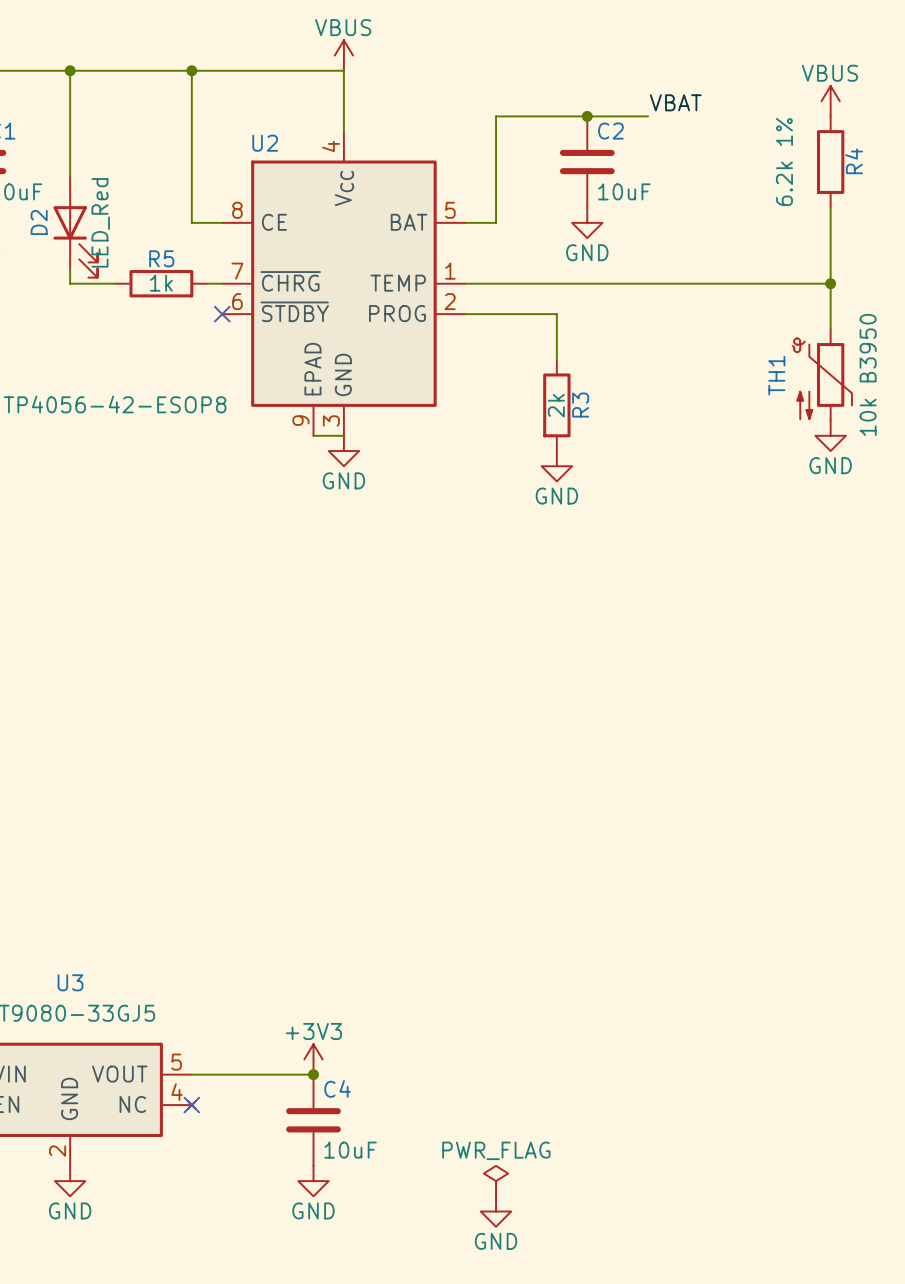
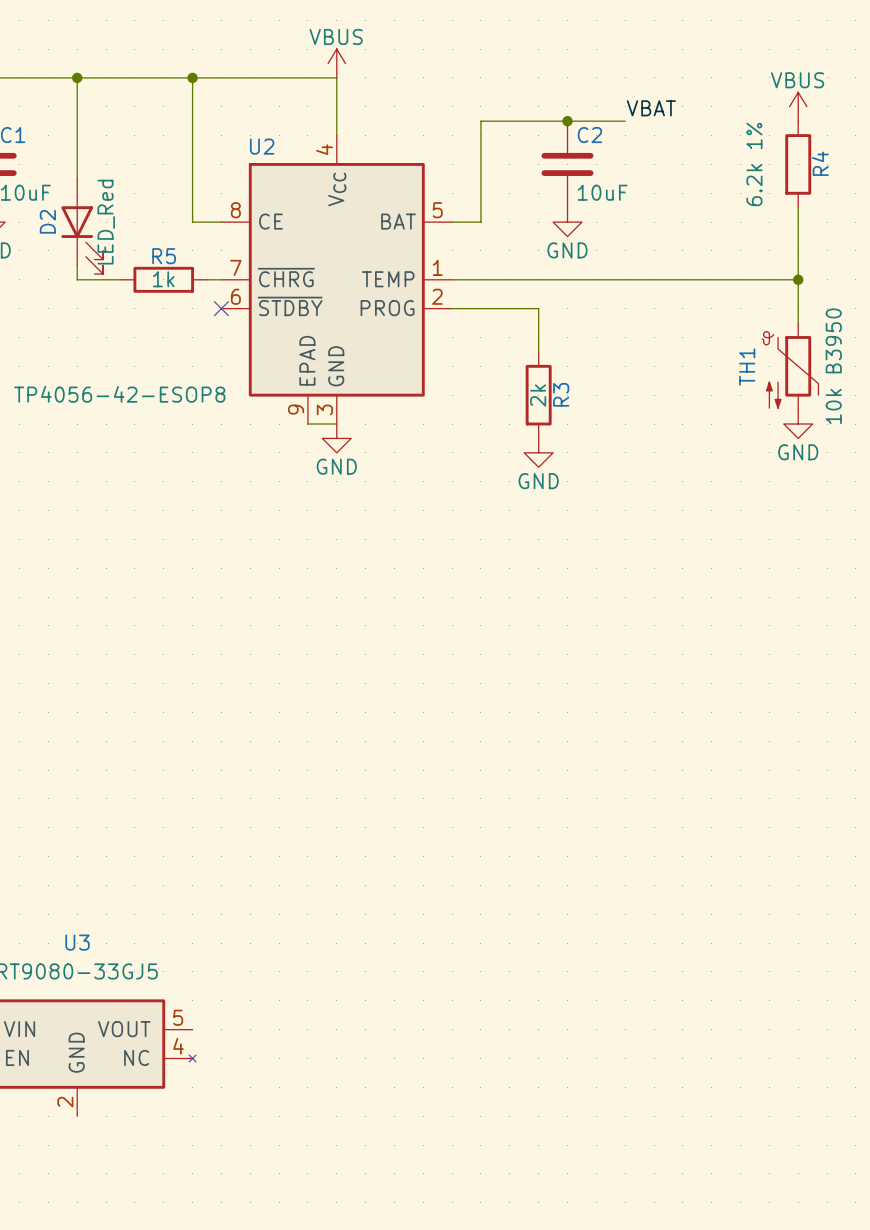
power symbol: +3V3 (313, 1059) -> none
wire: (191, 1074) (313, 1074) -> none
junction: (313, 1074) -> none
no-connect mark: (191, 1105) -> none
C4: 10uF (313, 1120) -> none
power symbol: GND (70, 1181) -> none
power symbol: GND (313, 1181) -> none
power symbol: PWR_FLAG (496, 1181) -> none
power symbol: GND (496, 1211) -> none

